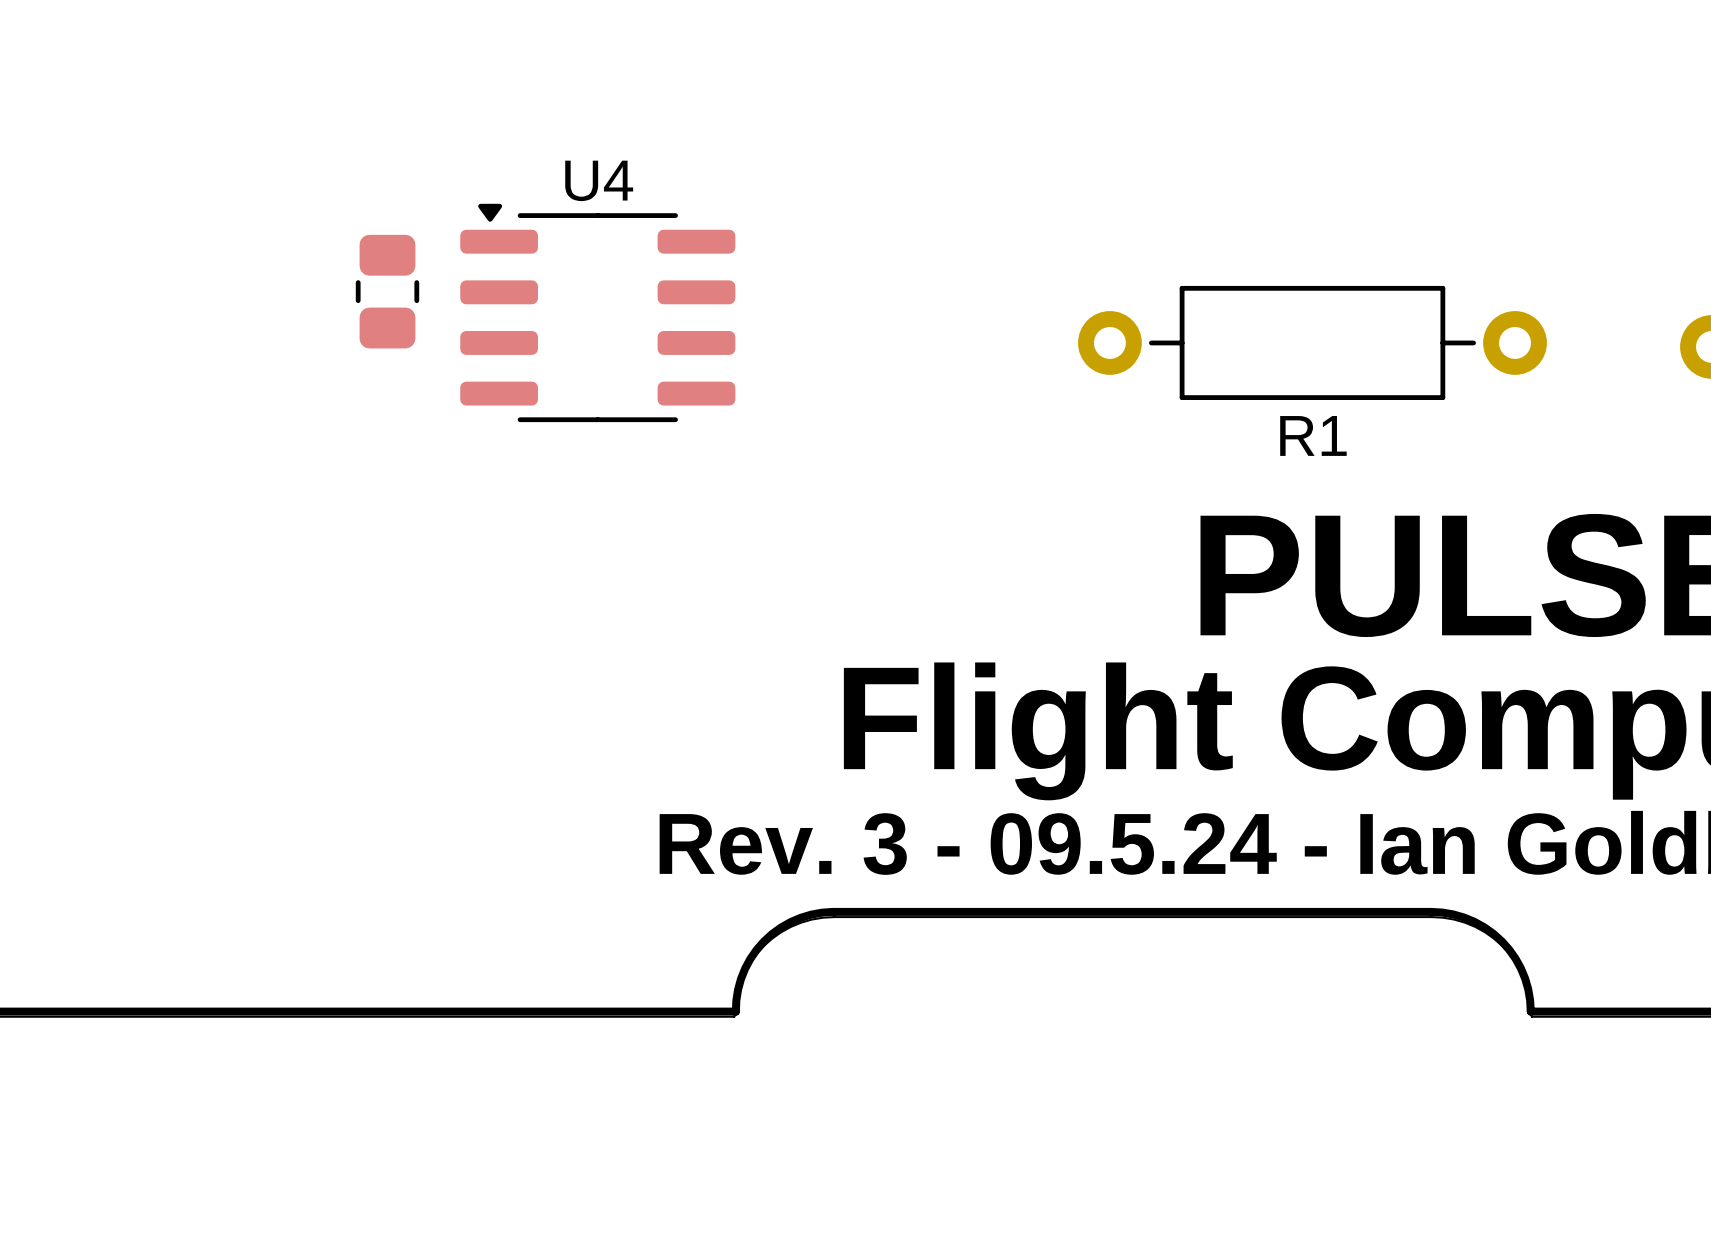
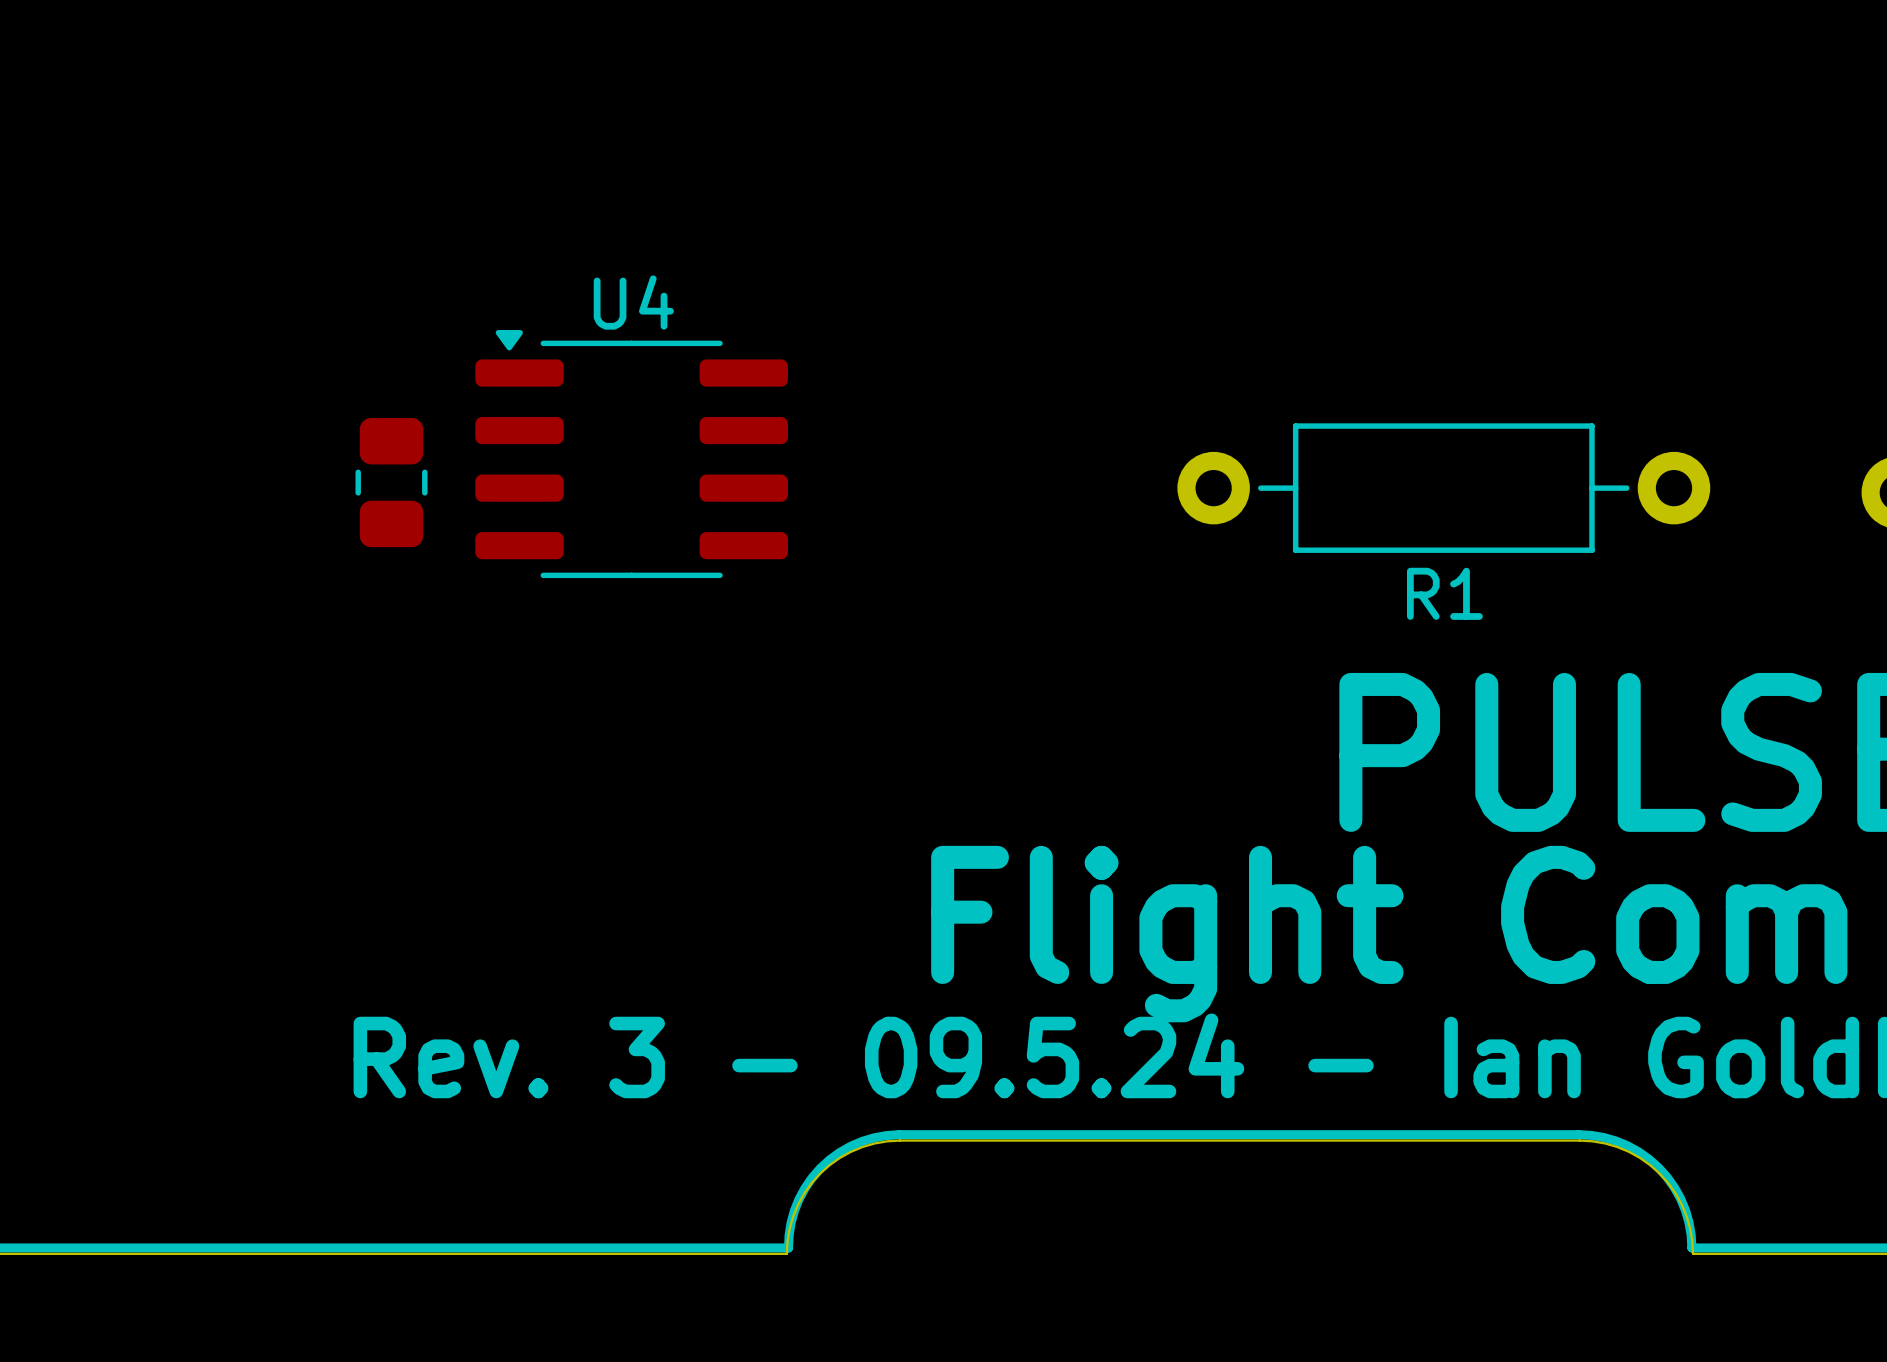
part position: (387, 291) -> (391, 482)

